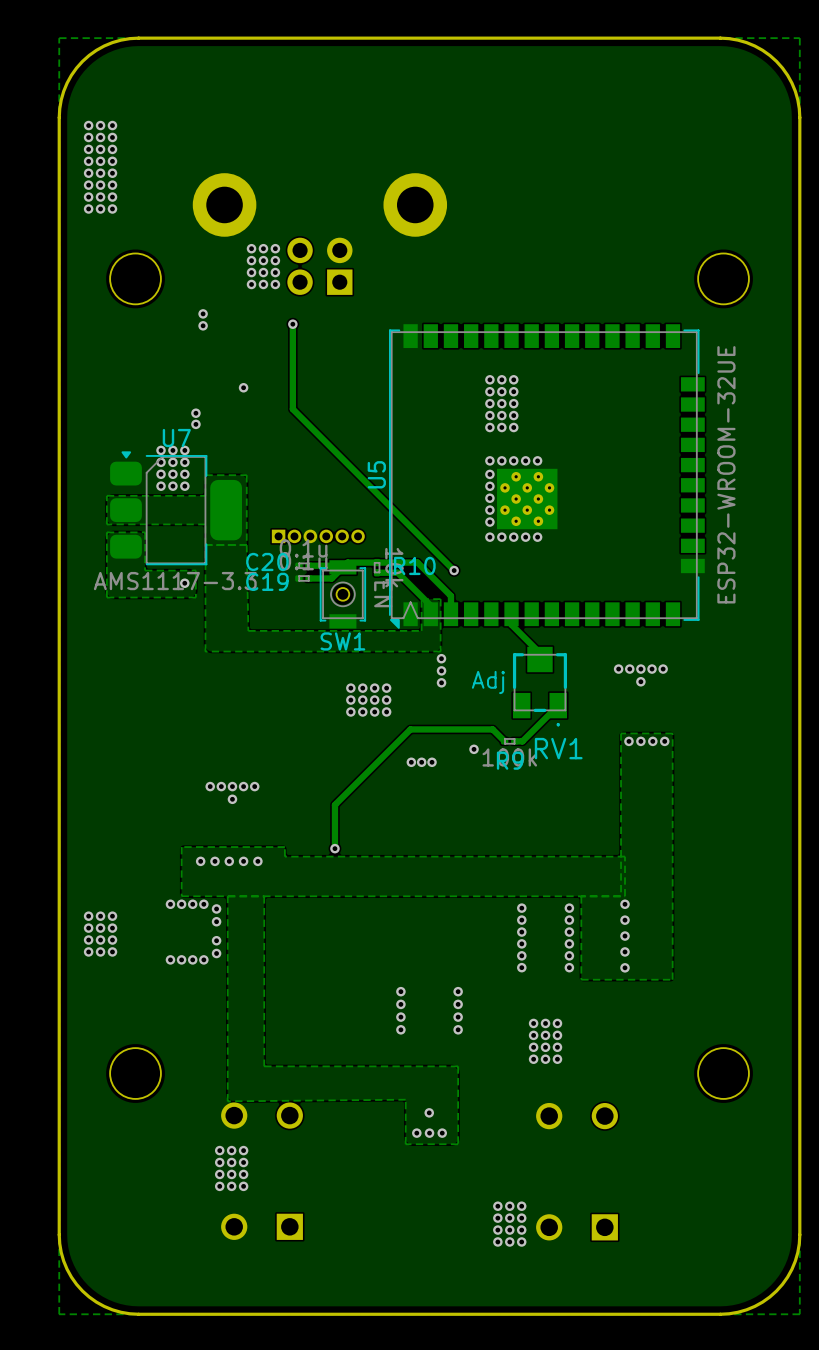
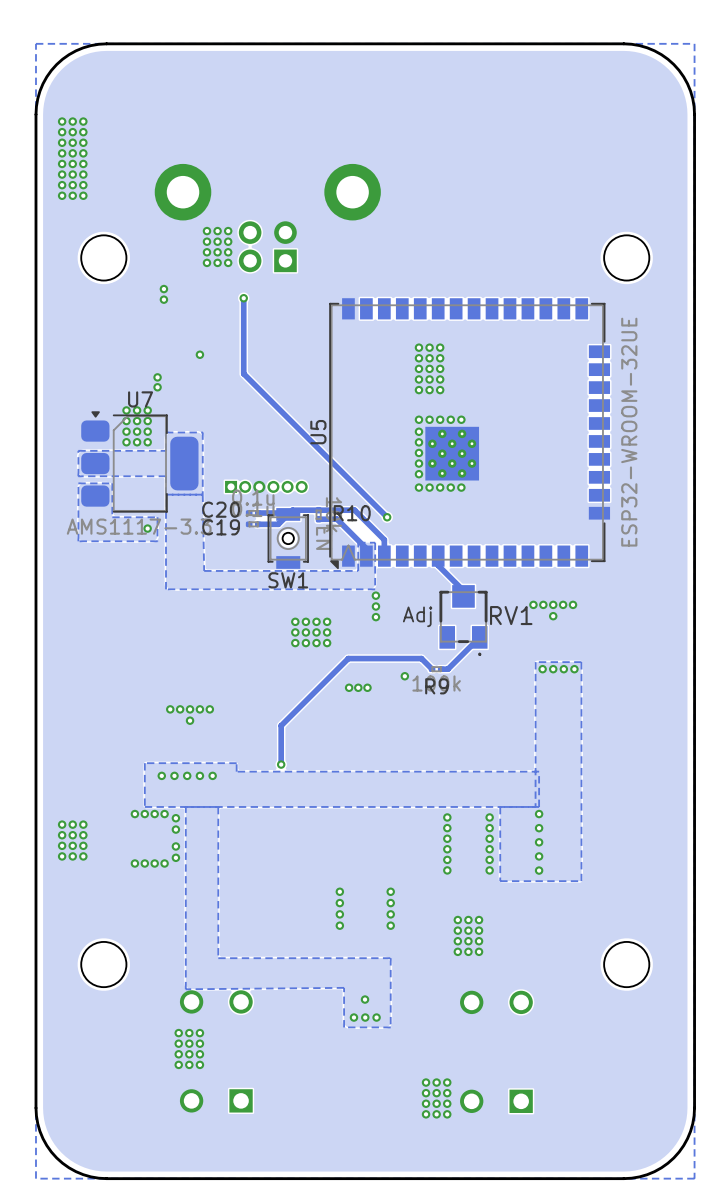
RV1 name position: RV1 (558, 748) -> RV1 (511, 615)

